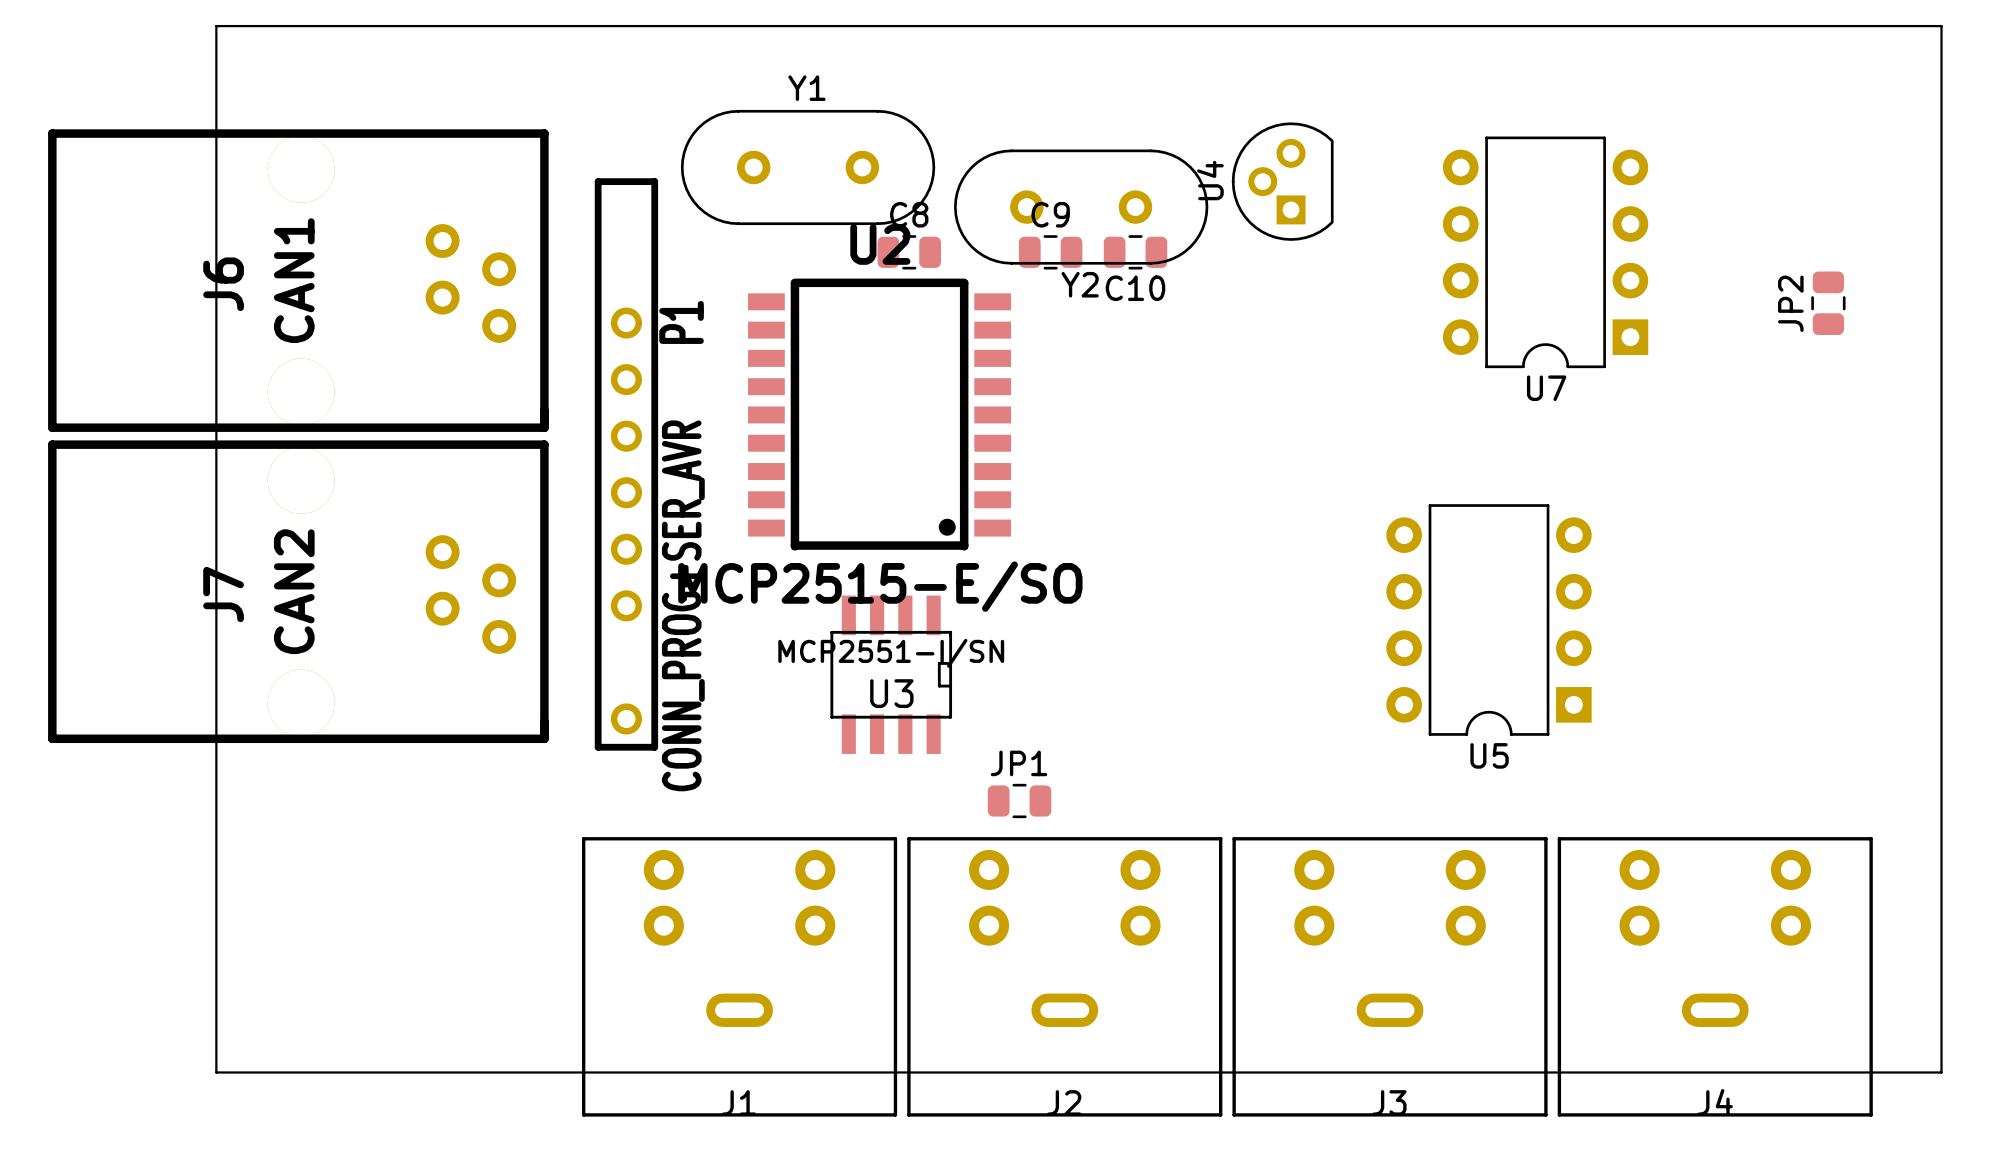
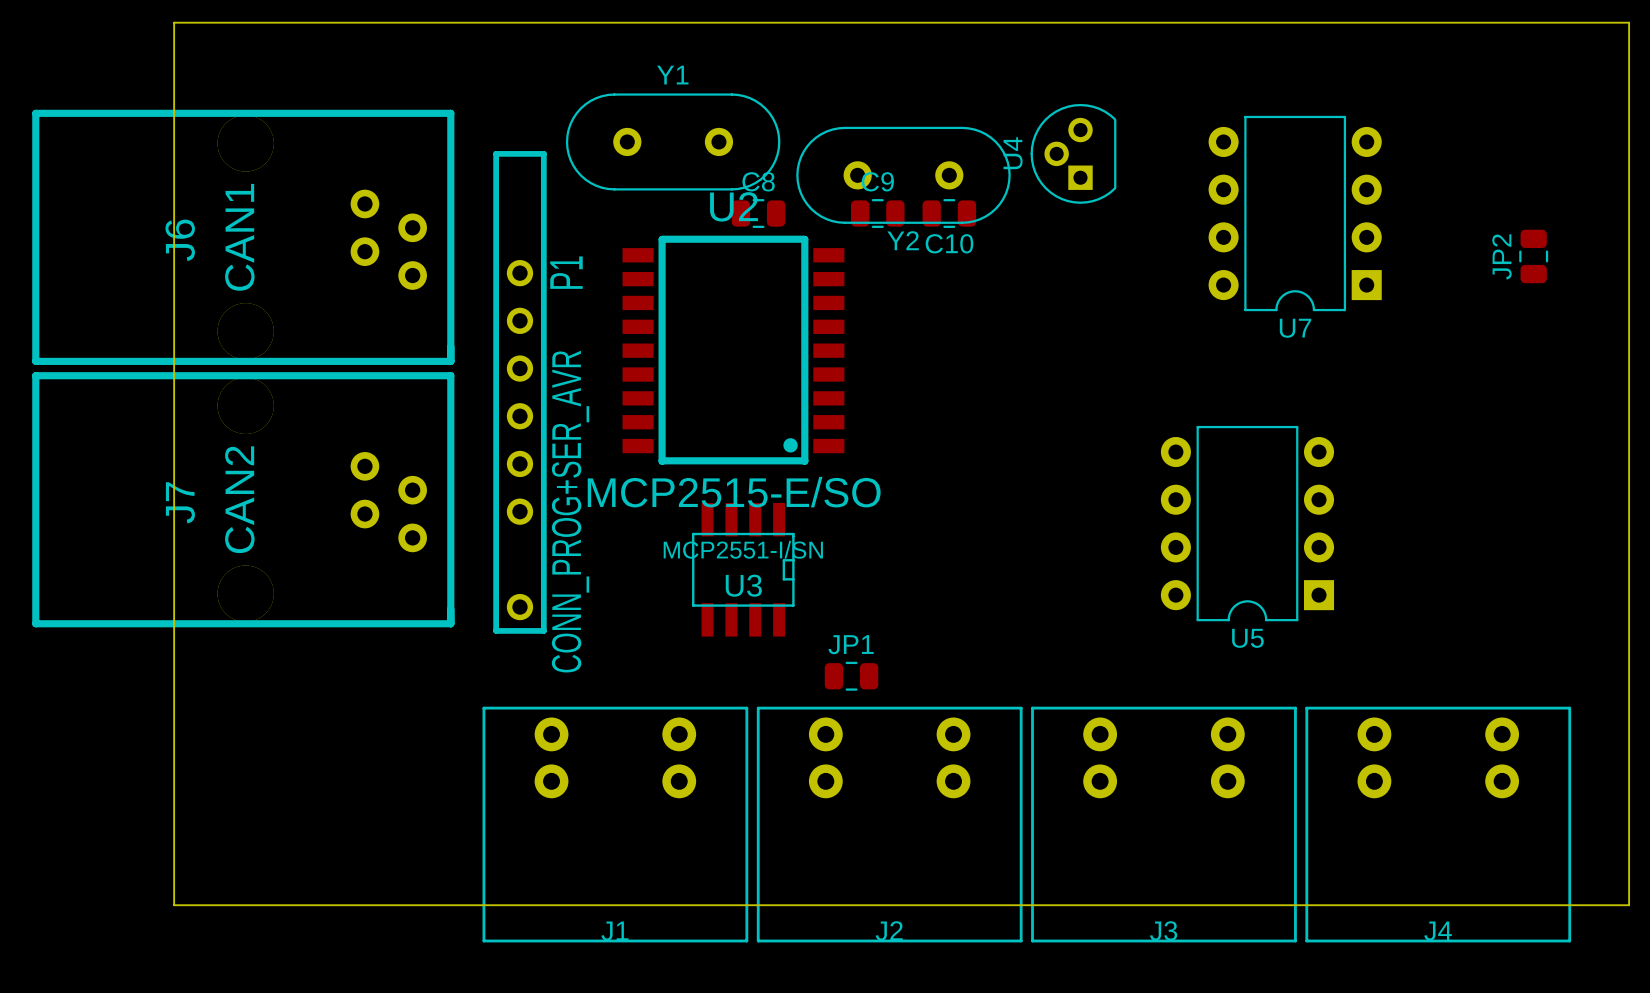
J1 footprint: [582, 837, 898, 1117] -> [482, 706, 749, 943]
J2 footprint: [907, 837, 1223, 1117] -> [756, 706, 1023, 943]
J3 footprint: [1232, 837, 1548, 1117] -> [1031, 706, 1297, 943]
J4 footprint: [1557, 837, 1873, 1117] -> [1305, 706, 1572, 943]

